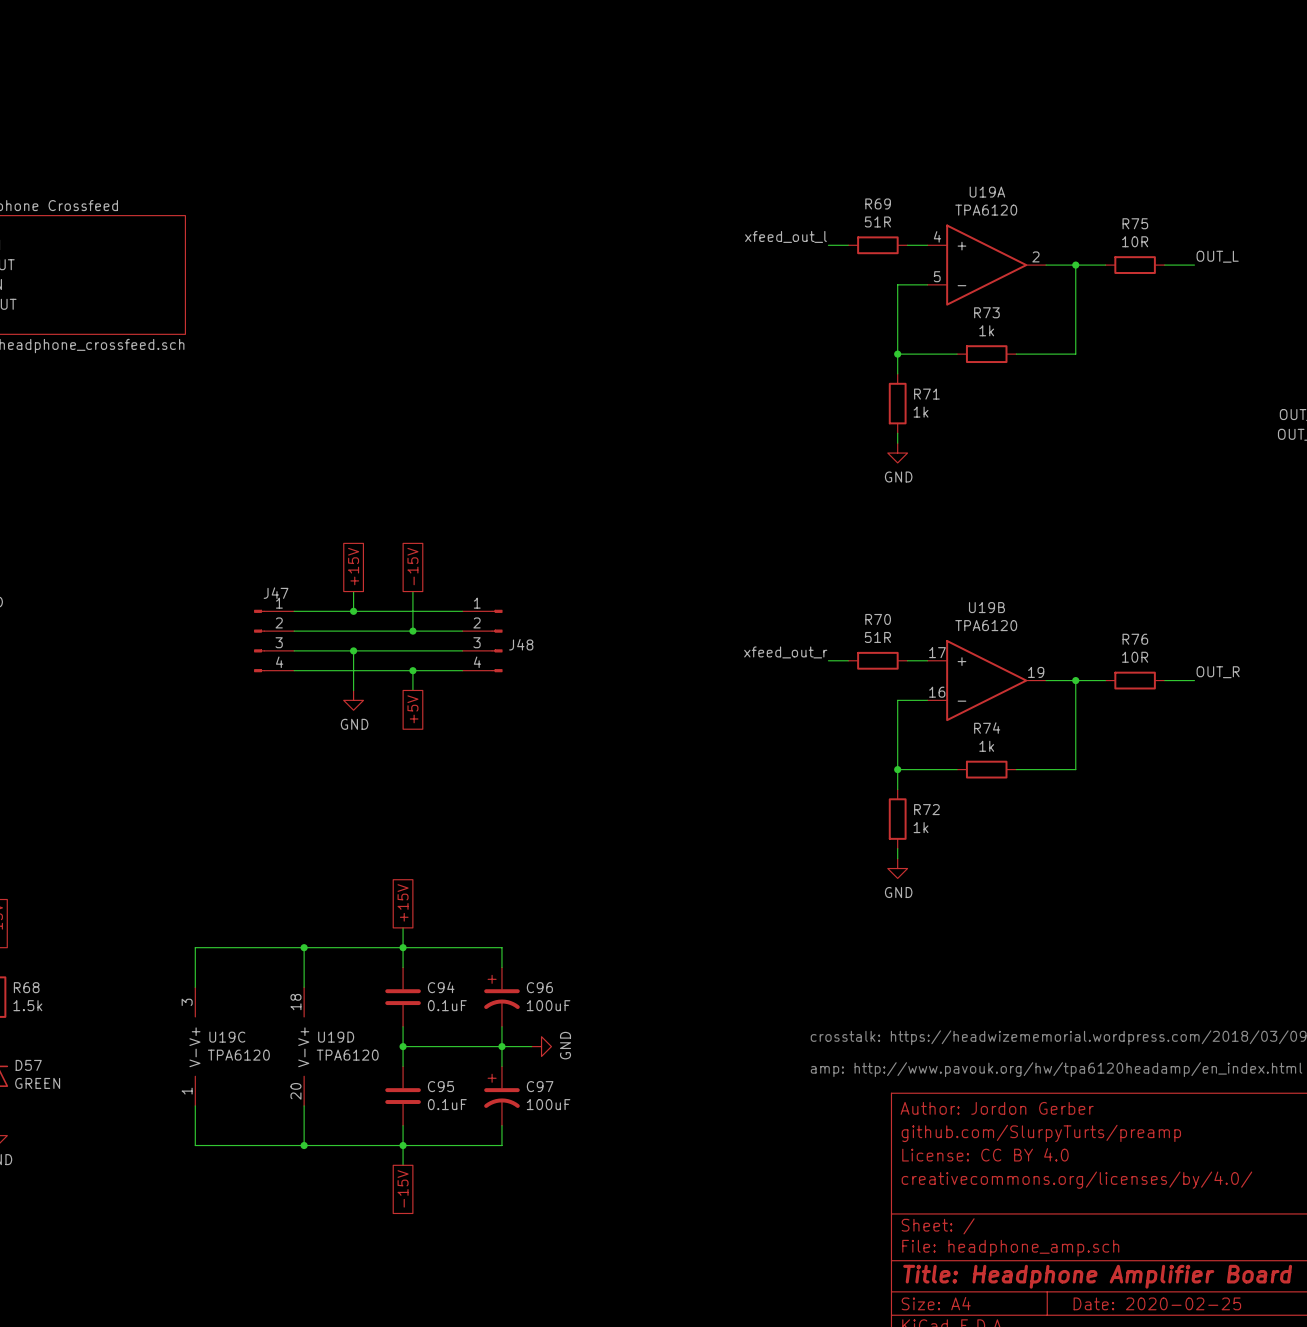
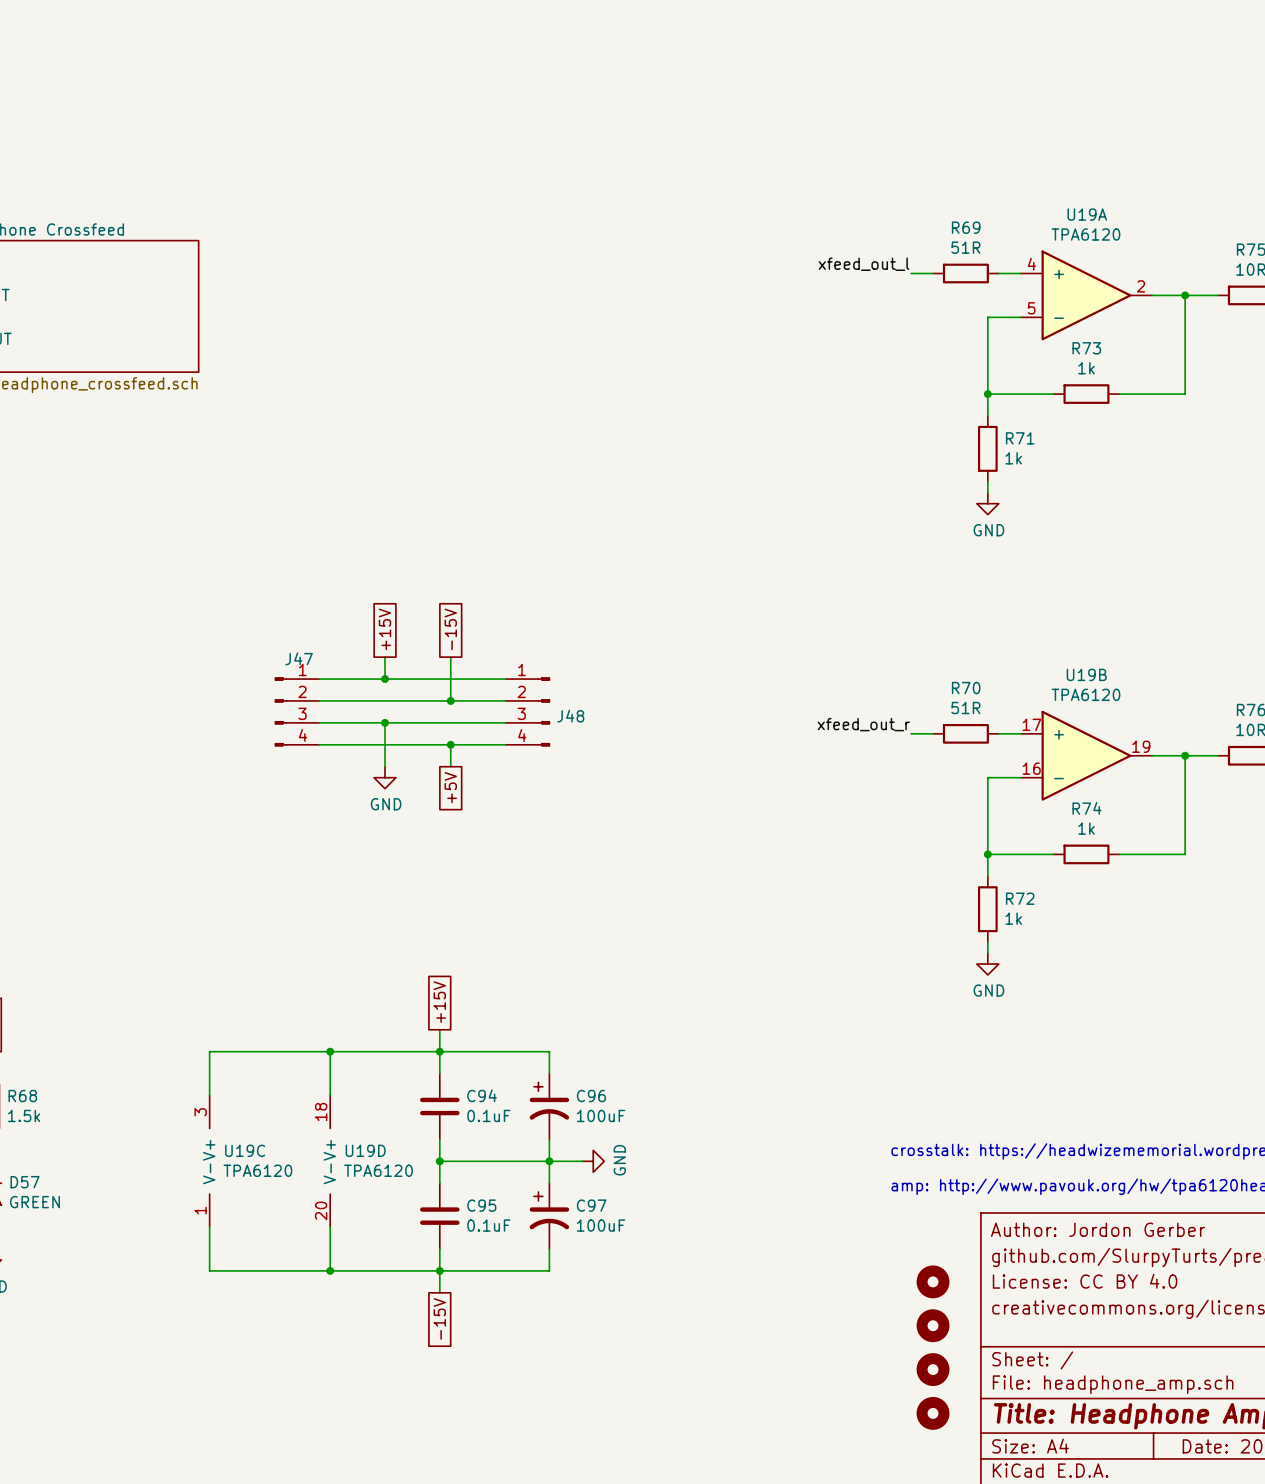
part: none -> (933, 1281)
part: none -> (933, 1325)
part: none -> (933, 1369)
part: none -> (933, 1413)

